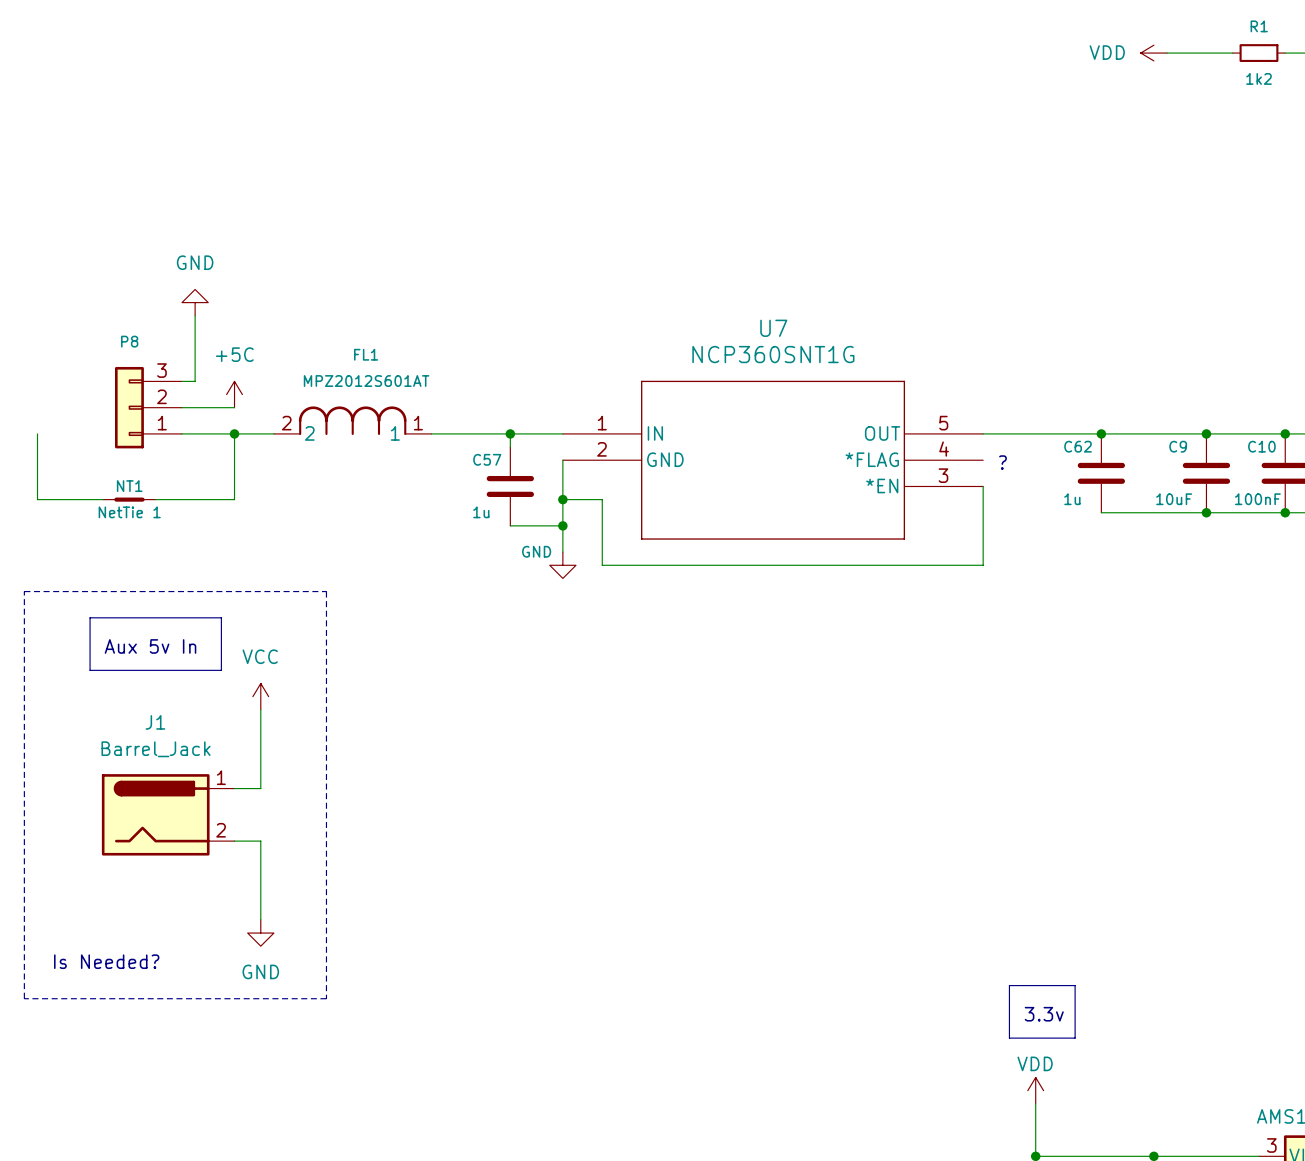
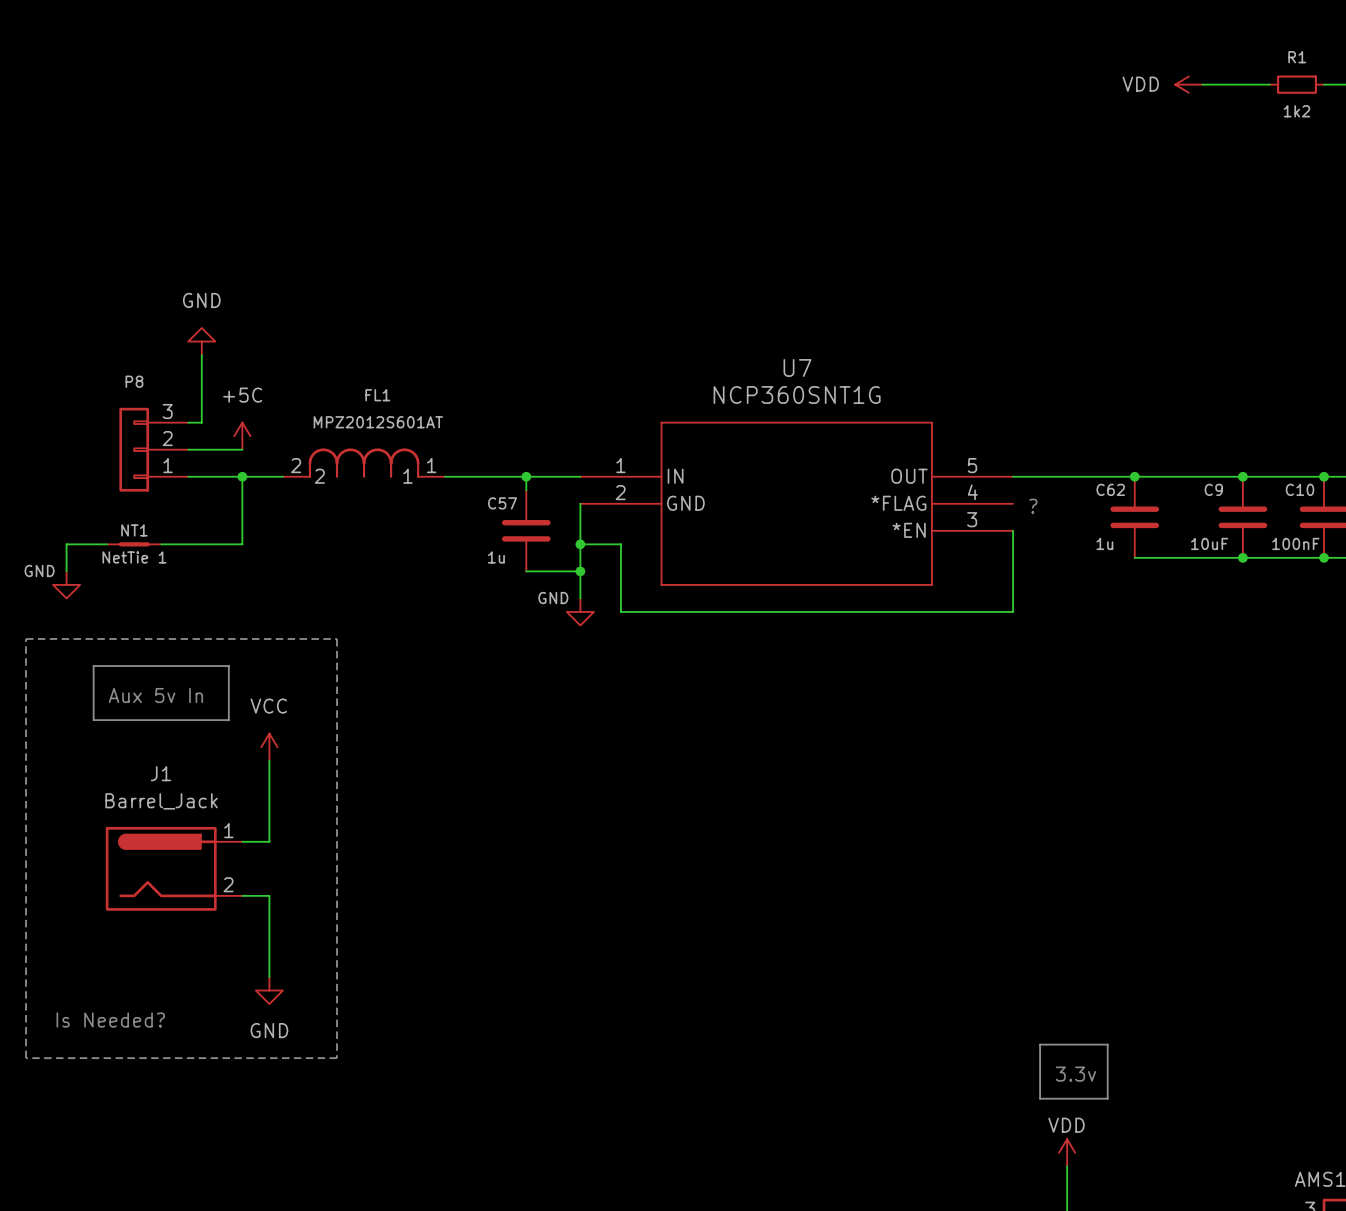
wire: (37, 433) (37, 499) (63, 499) -> (66, 571) (66, 544)
power symbol: none -> GND (66, 584)

